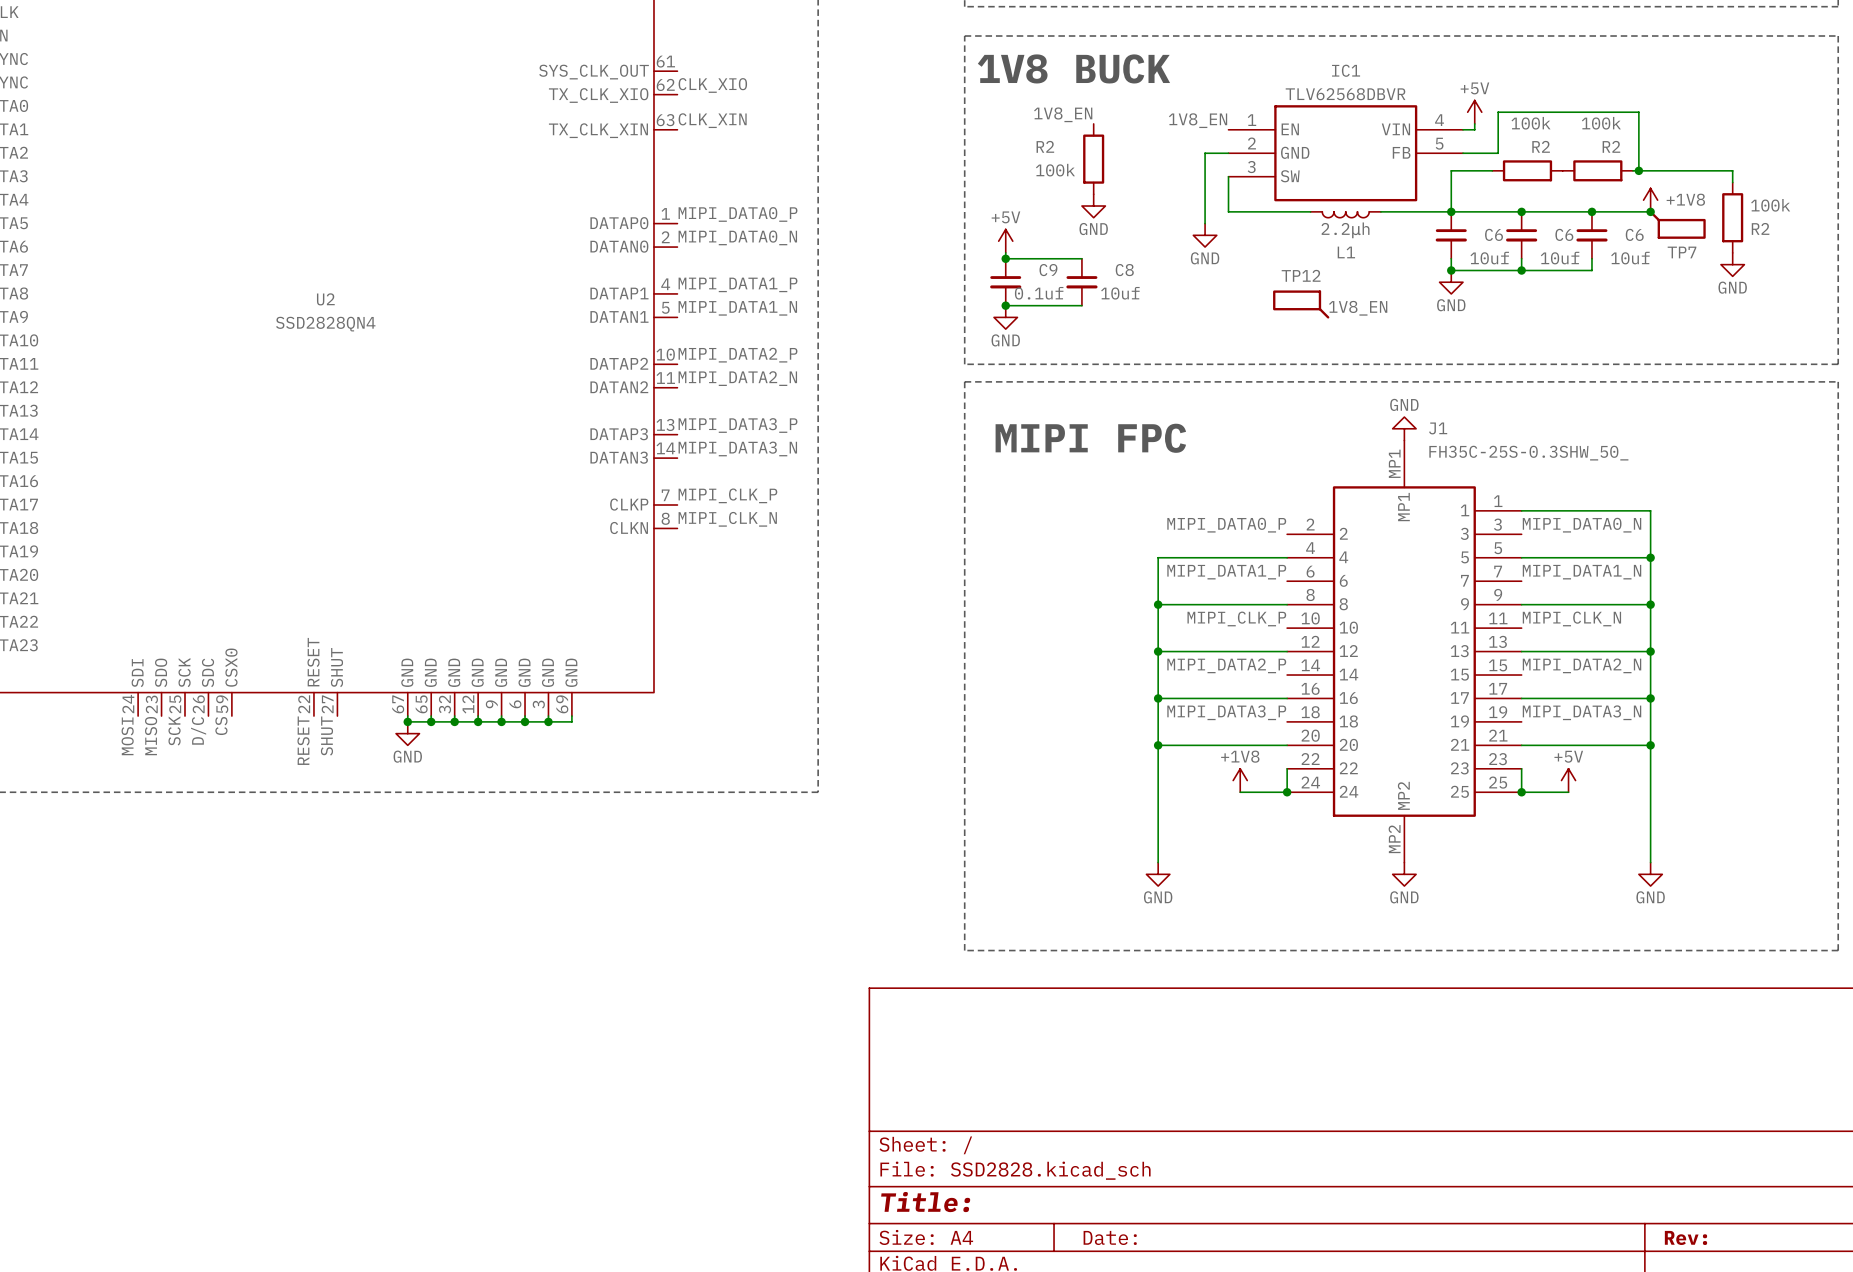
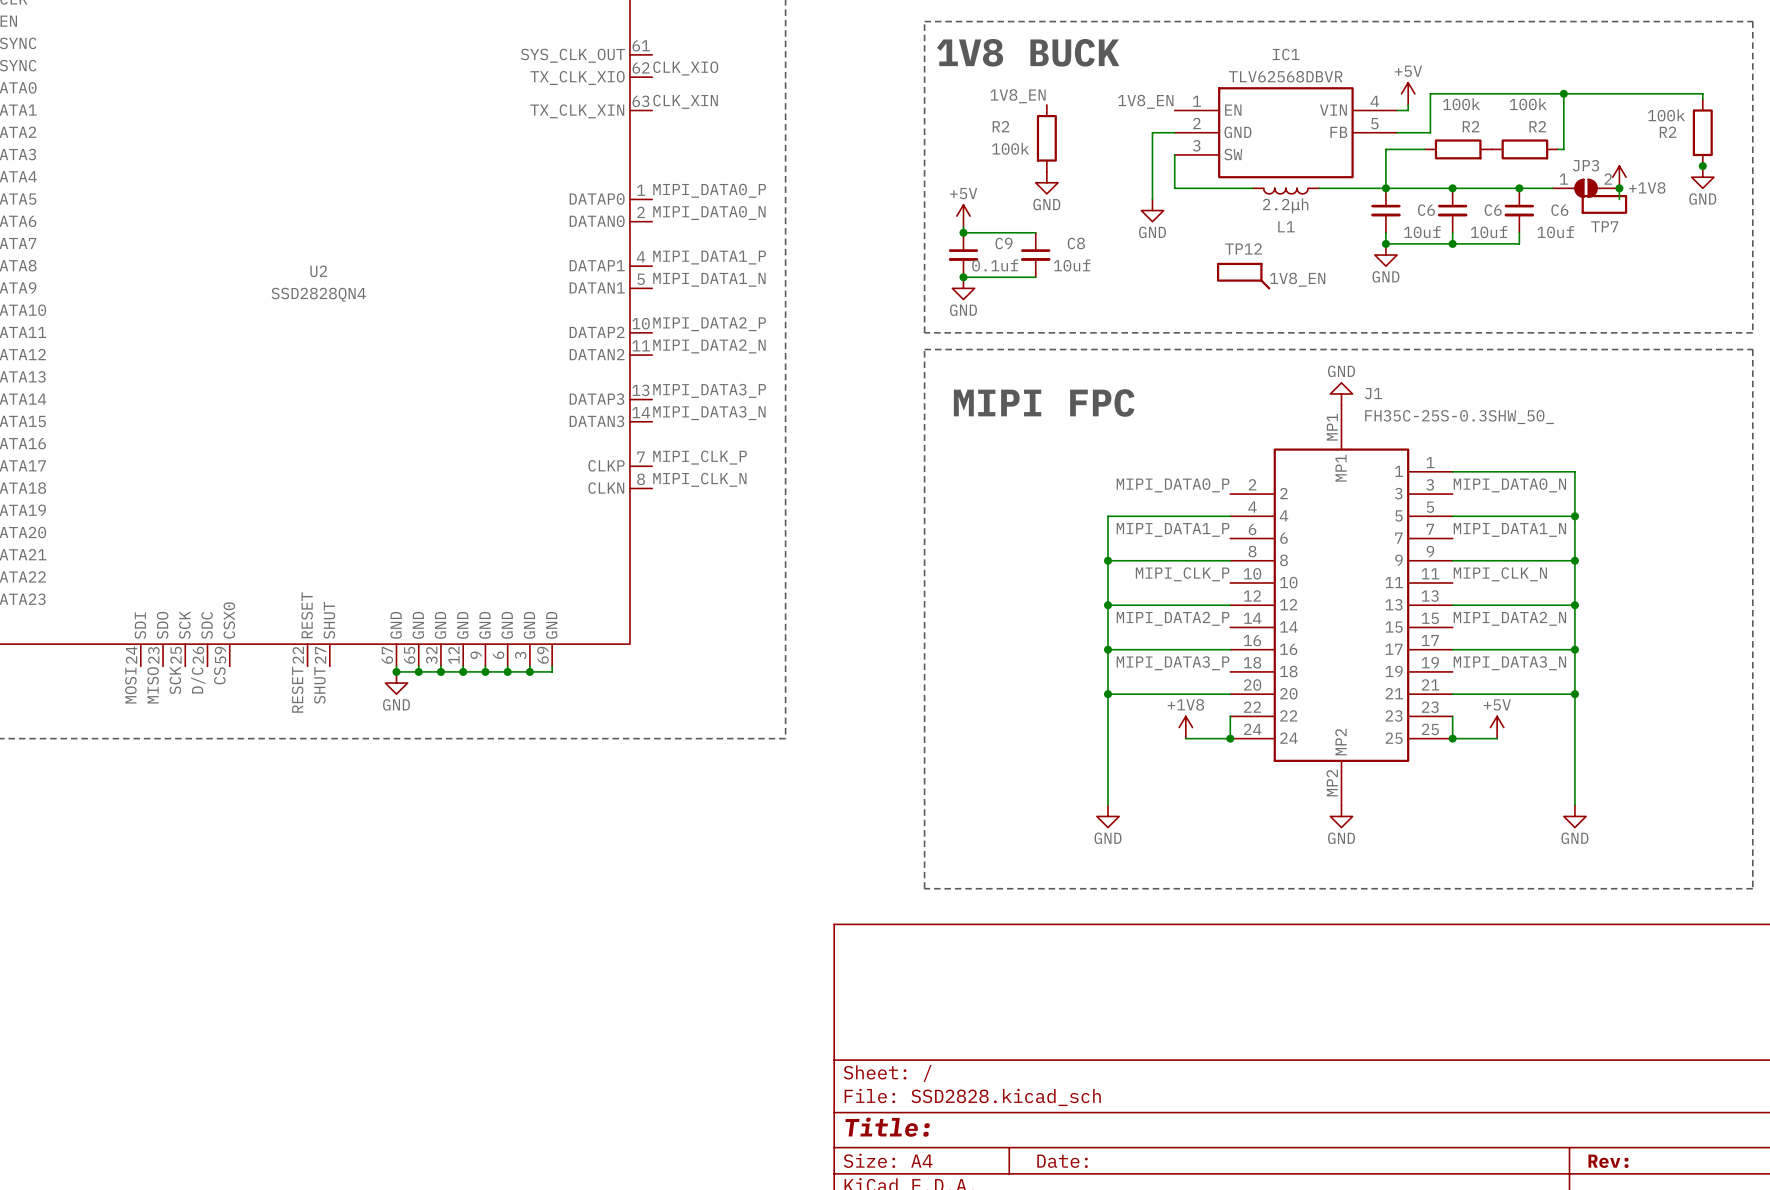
wire: none -> (1563, 93) (1702, 93) (1702, 99)
junction: none -> (1563, 93)
wire: (1638, 170) (1732, 170) (1732, 182) -> none
junction: (1638, 170) -> none
junction: none -> (1702, 166)
power symbol text position: +1V8 (1685, 199) -> +1V8 (1647, 187)
power symbol position: +1V8 (1650, 200) -> +1V8 (1619, 177)
R2 value position: 100k (1770, 205) -> 100k (1666, 115)
junction: (1650, 211) -> none
JP3: none -> (1586, 188)
wire: none -> (1619, 188) (1619, 199)
junction: none -> (1619, 188)
R2 position: (1732, 217) -> (1702, 132)
R2 name position: R2 (1760, 228) -> R2 (1668, 132)
power symbol position: GND (1732, 264) -> GND (1702, 177)

